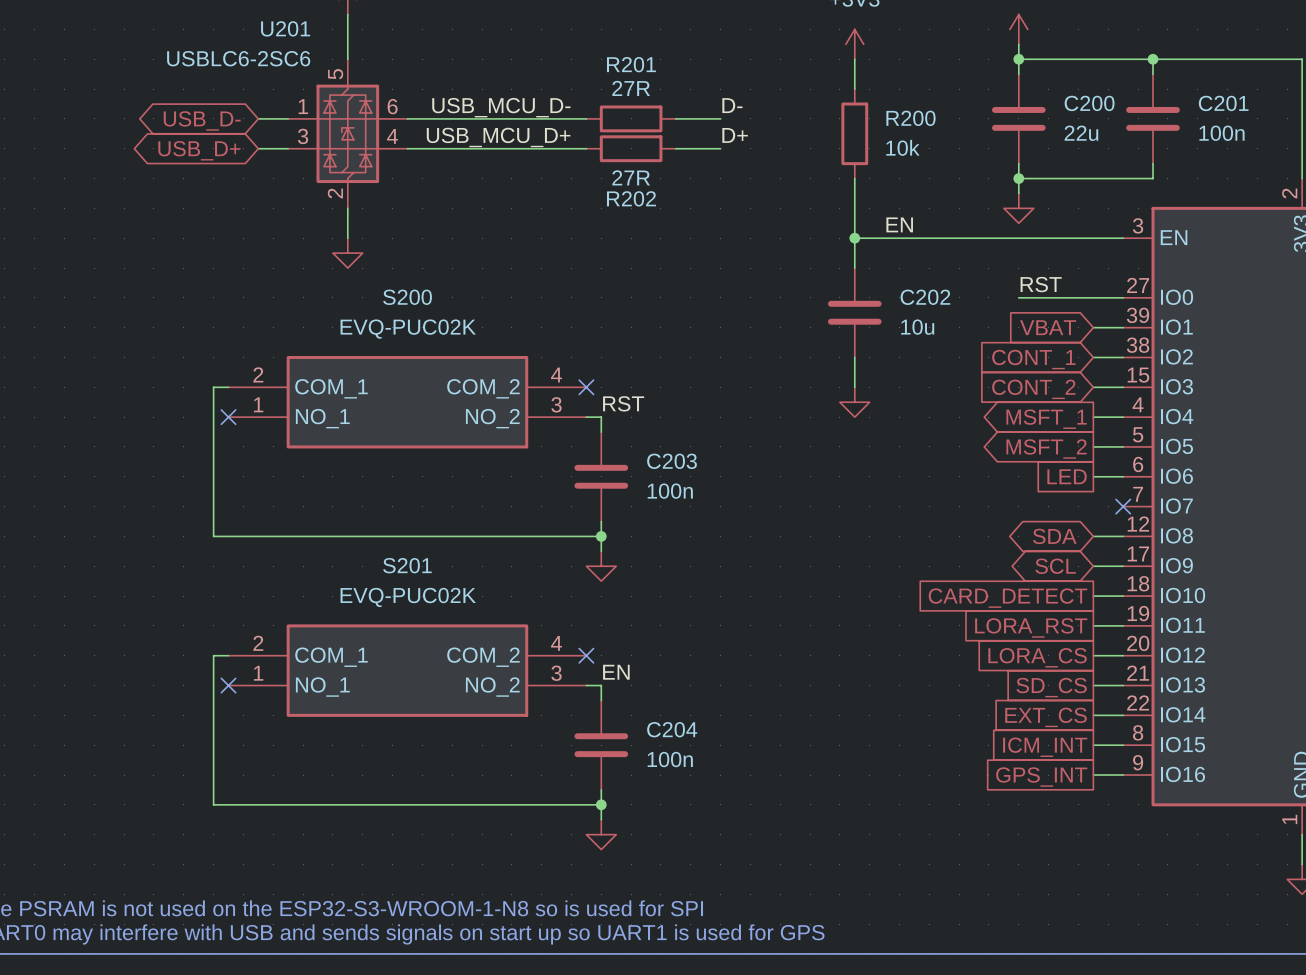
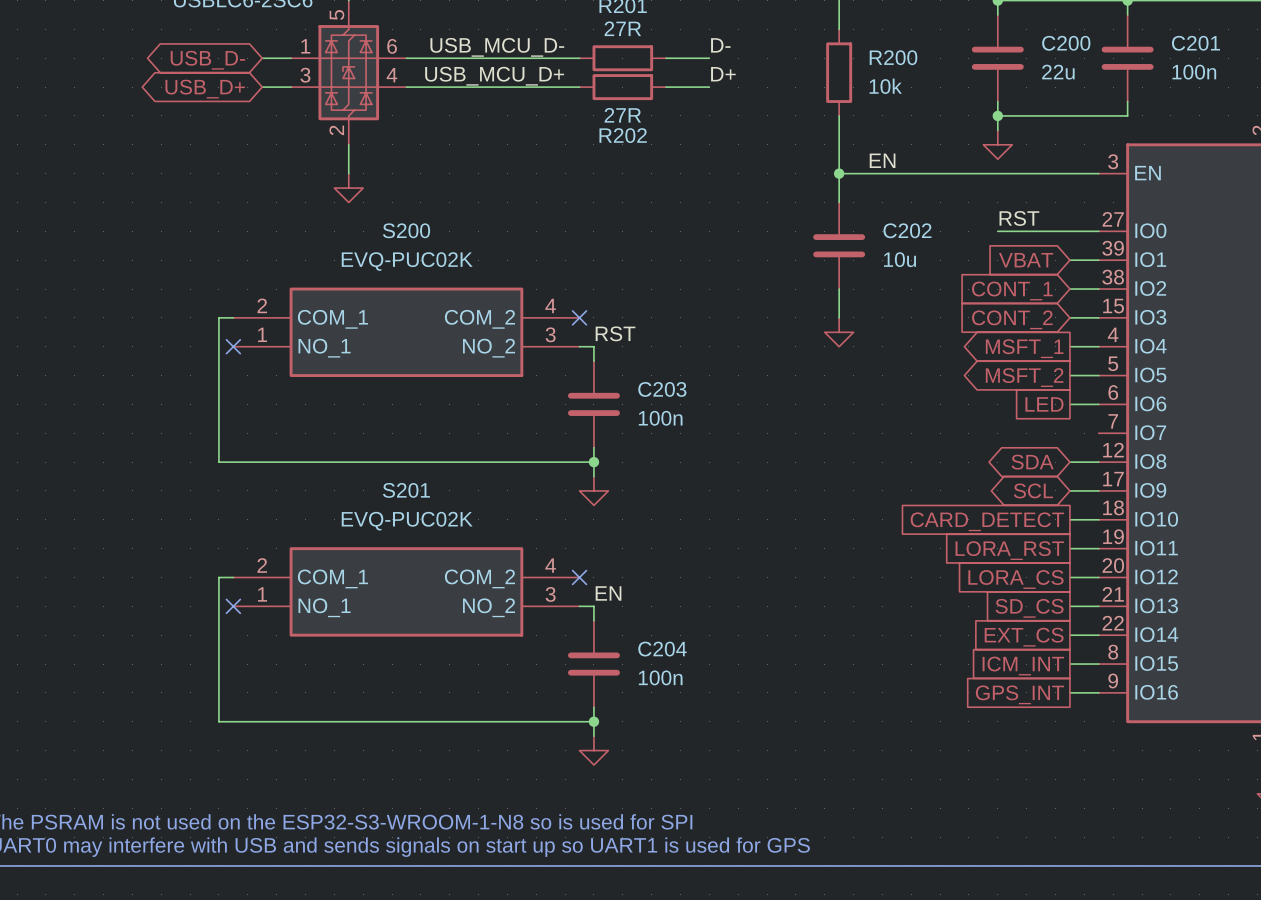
no-connect mark: (1123, 506) -> none

